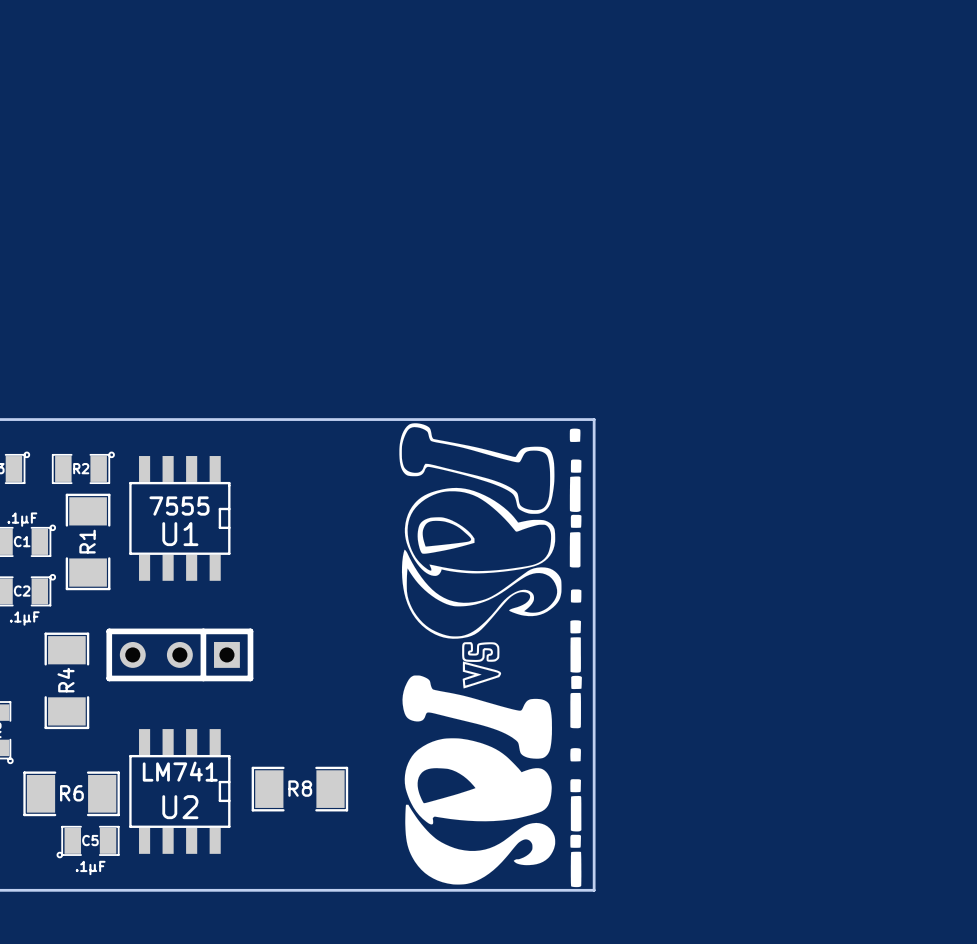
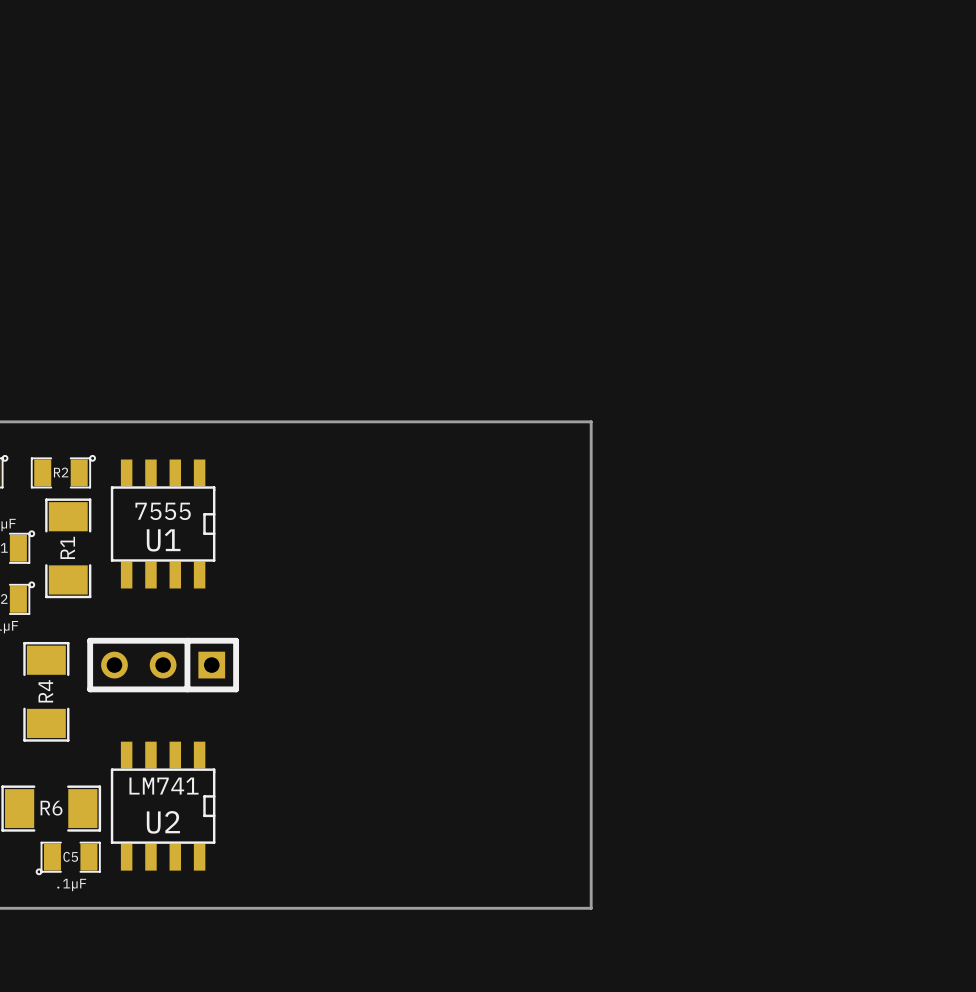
drawing: [399, 423, 582, 888] -> none
R8: (299, 789) -> none

